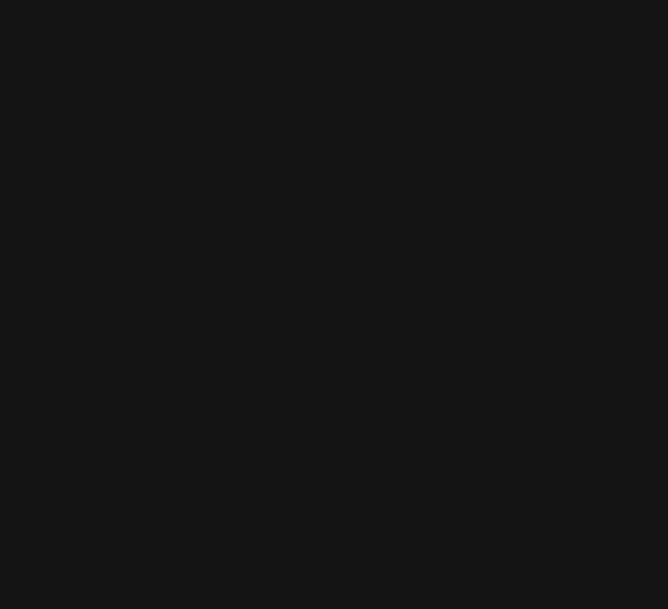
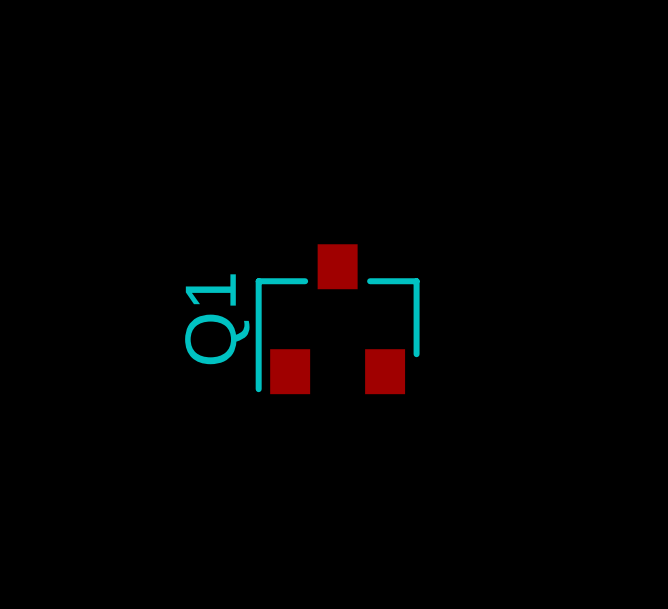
Q1: none -> (337, 319)

